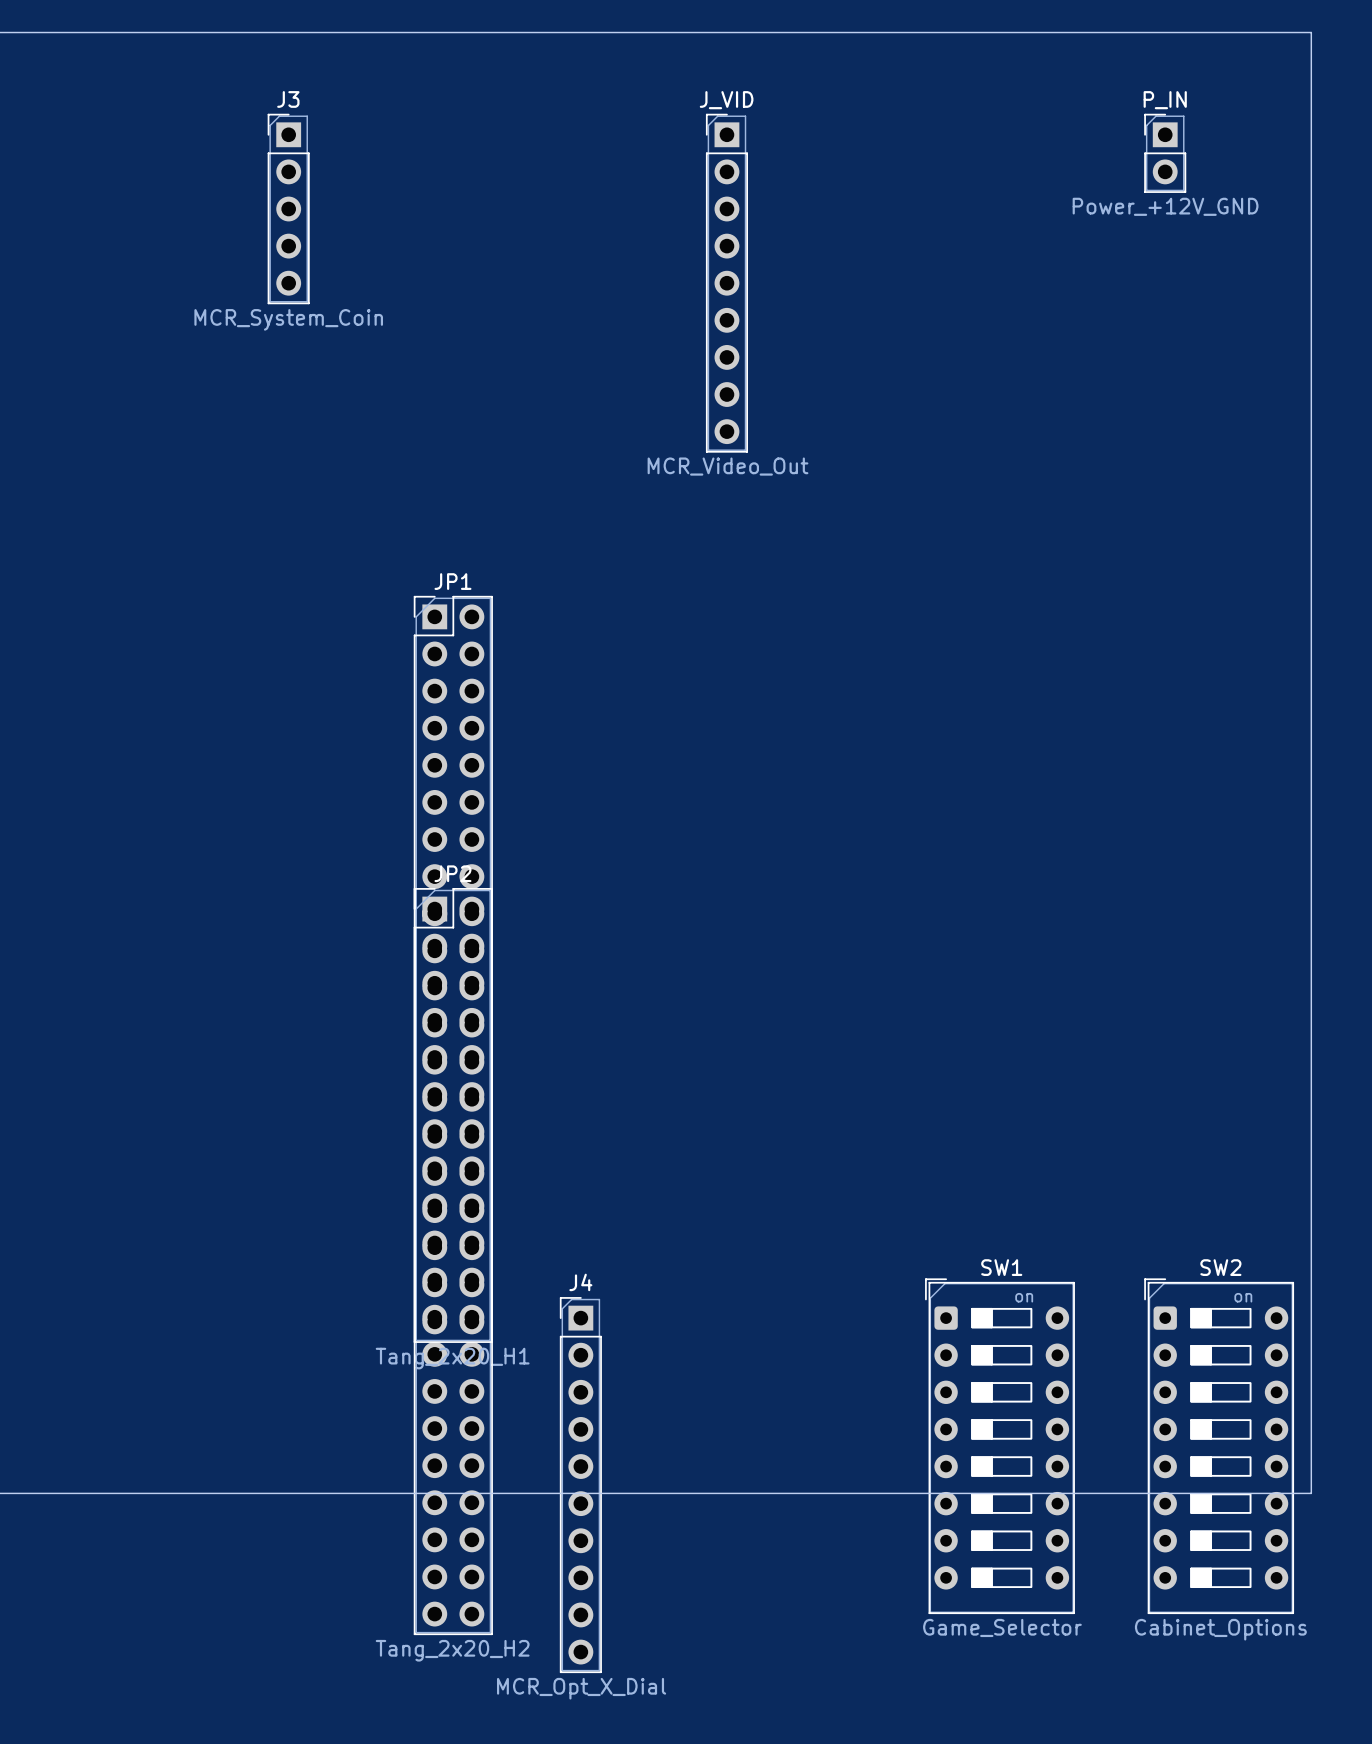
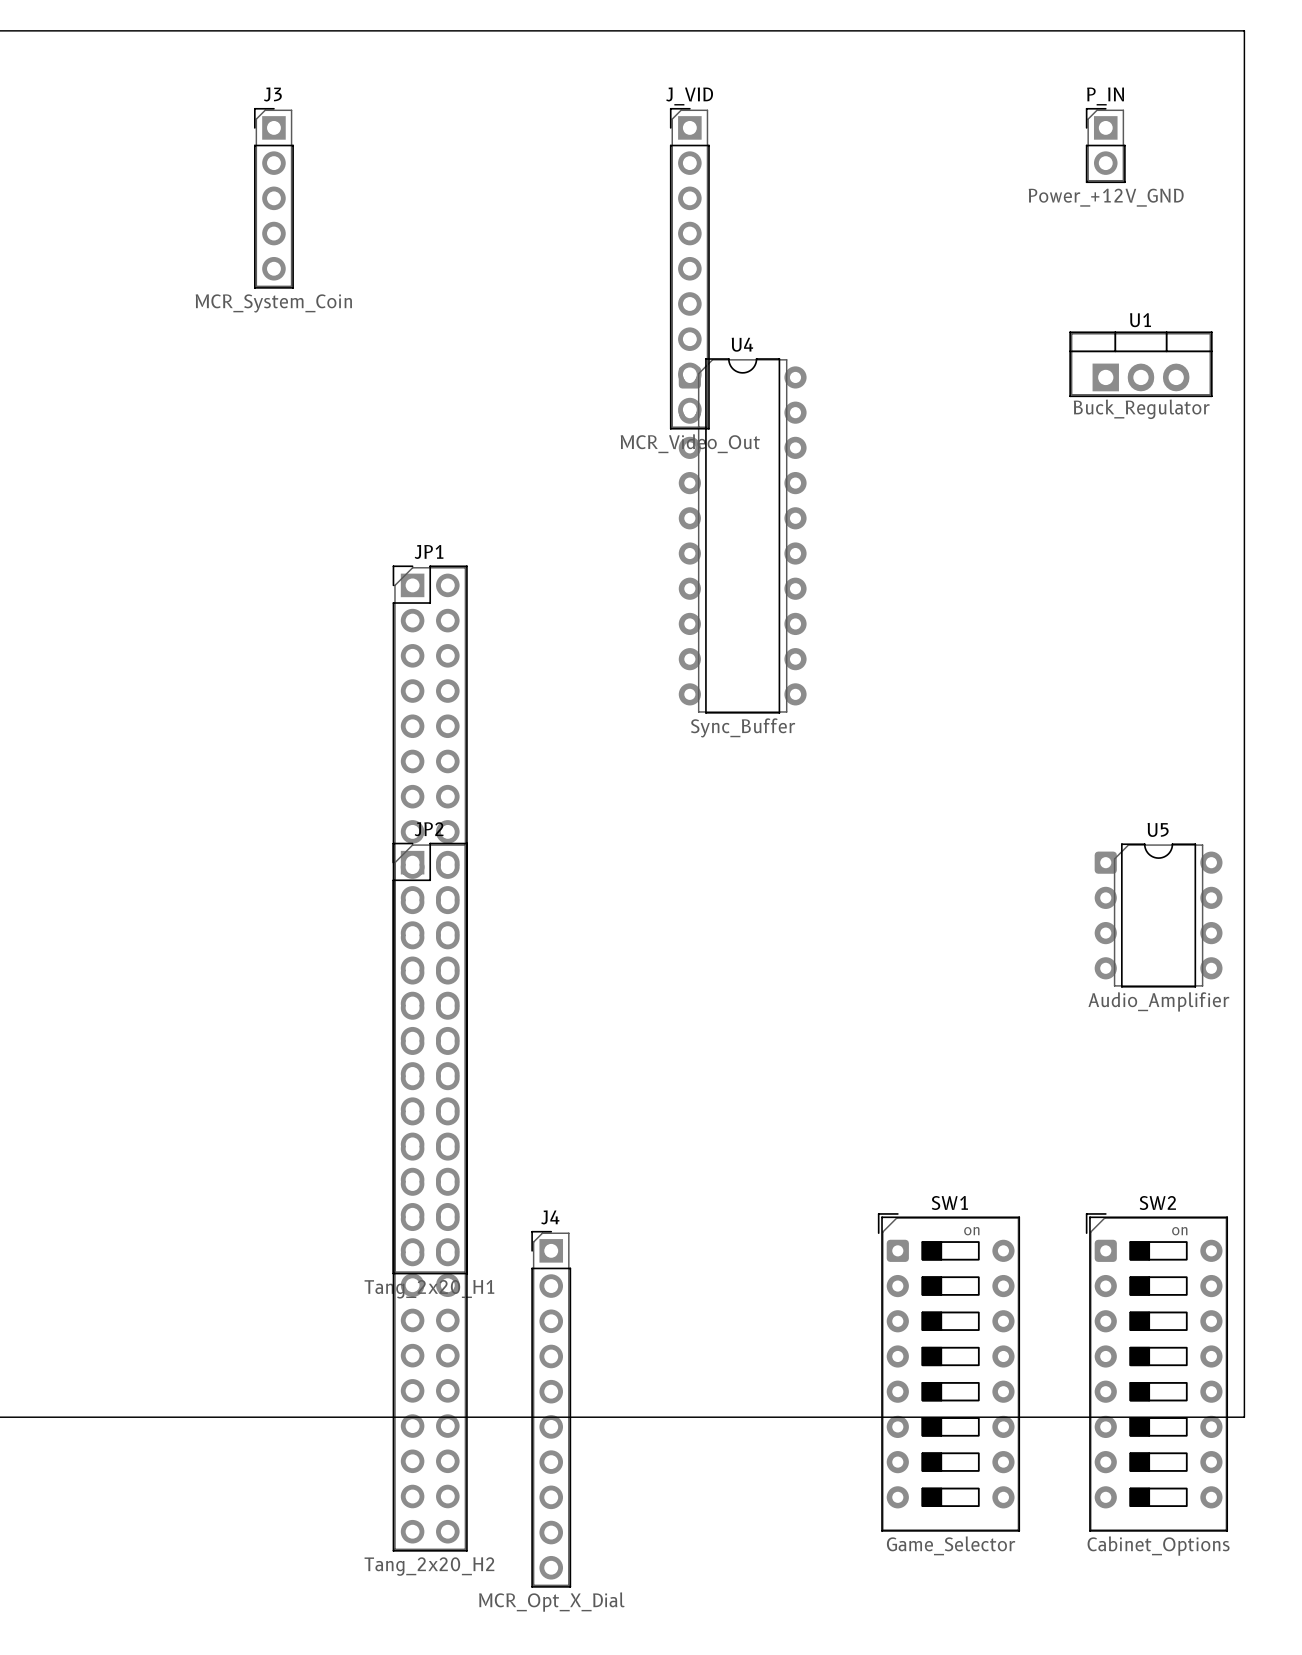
U1: none -> Buck_Regulator (1140, 364)
U4: none -> Sync_Buffer (742, 535)
U5: none -> Audio_Amplifier (1158, 915)

